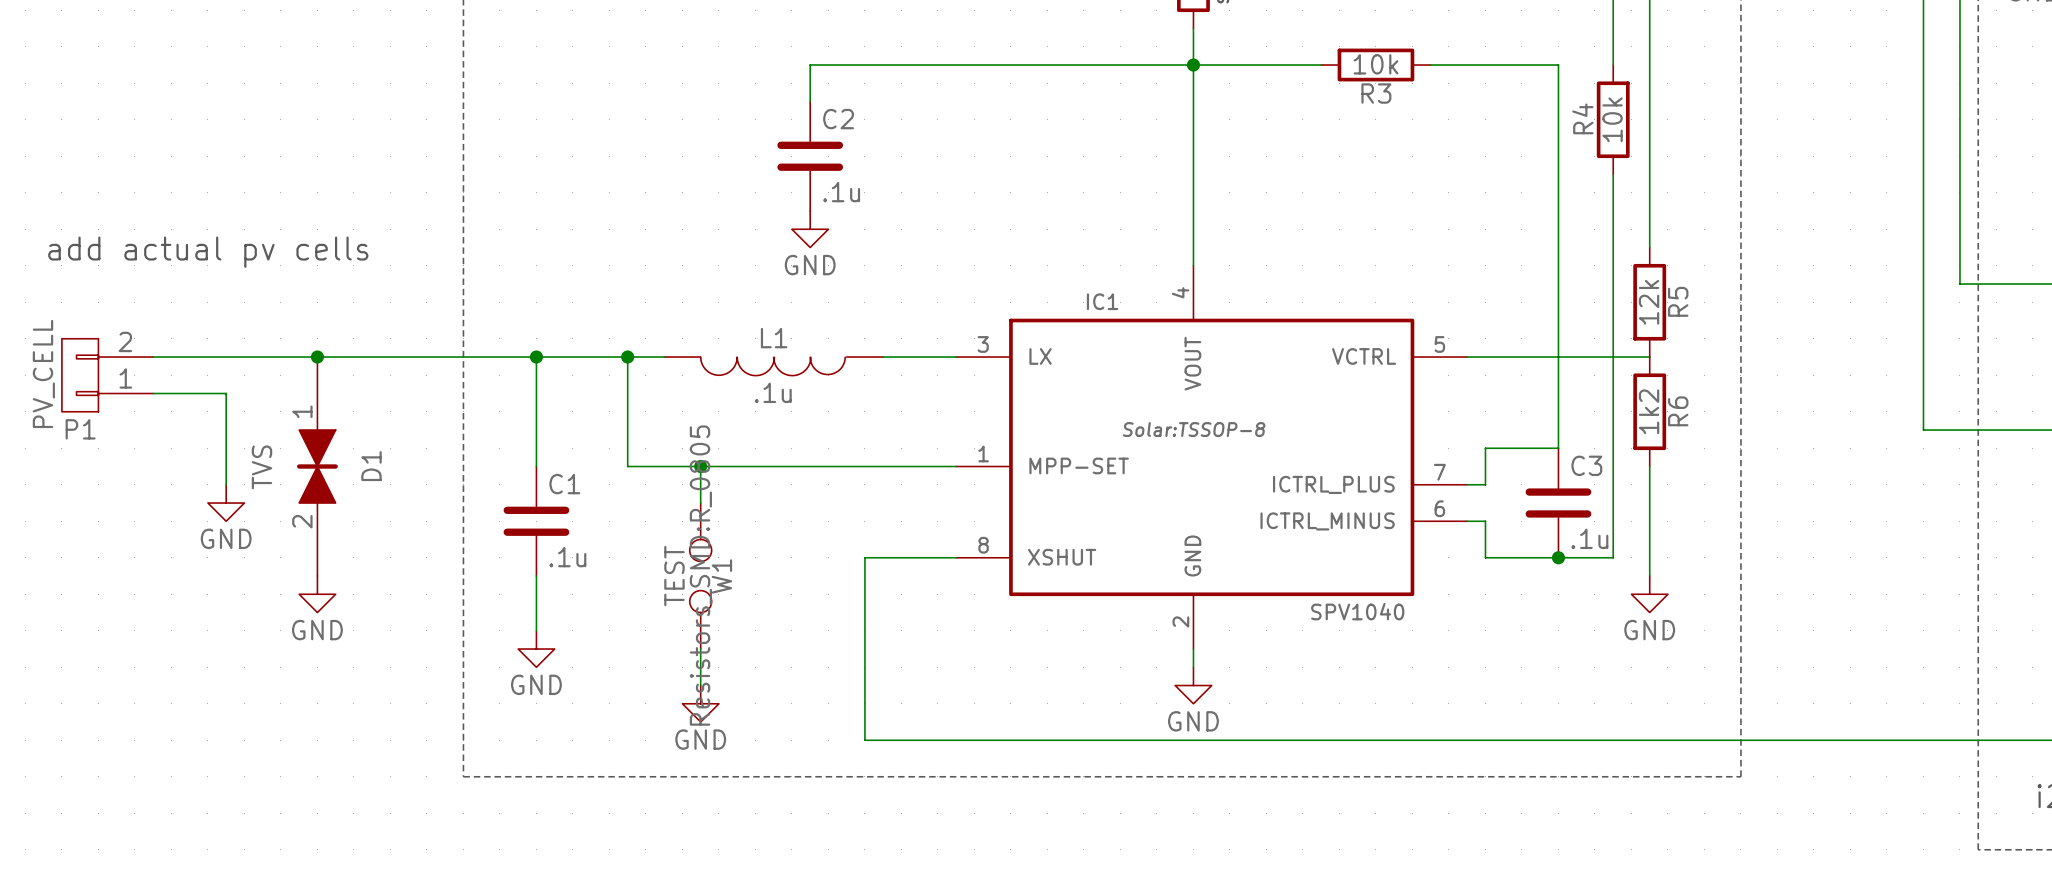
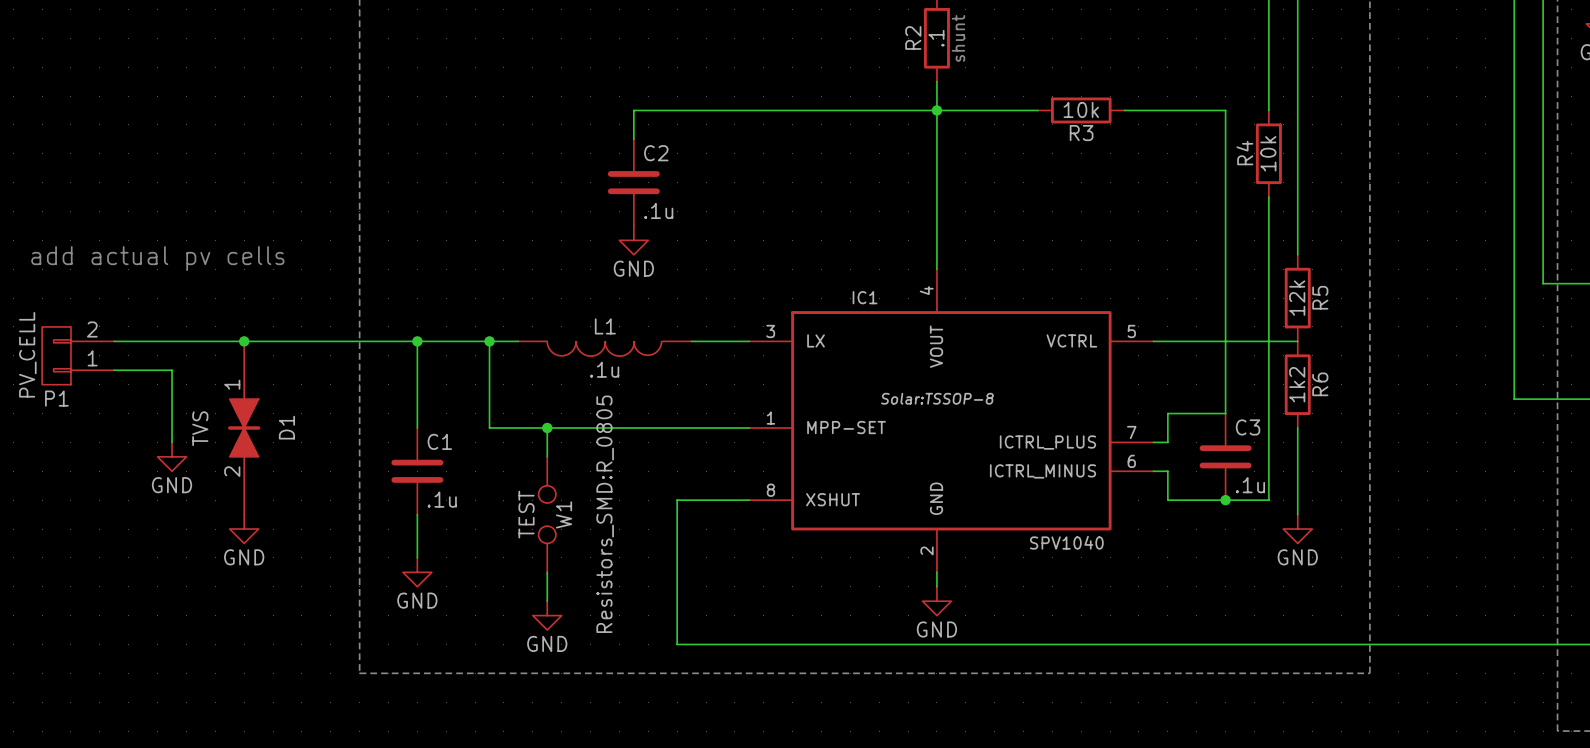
W1 text position: Resistors_SMD:R_0805 (700, 575) -> Resistors_SMD:R_0805 (605, 514)

